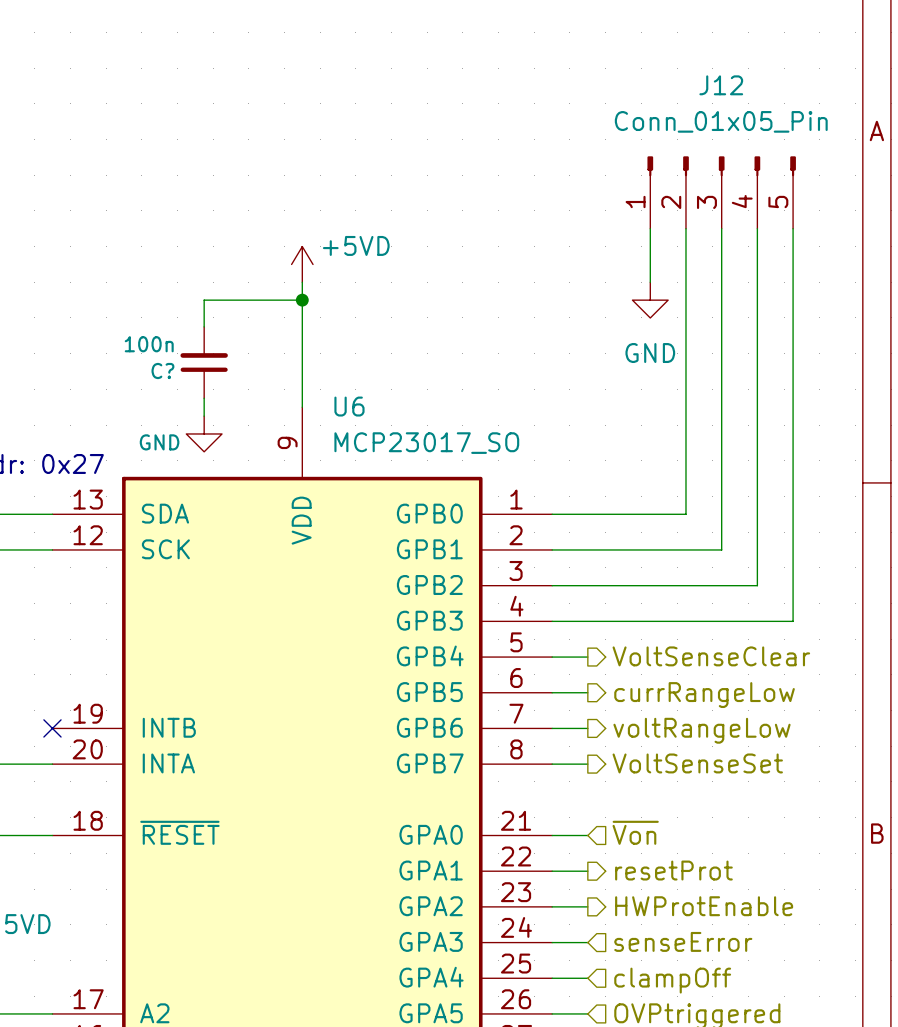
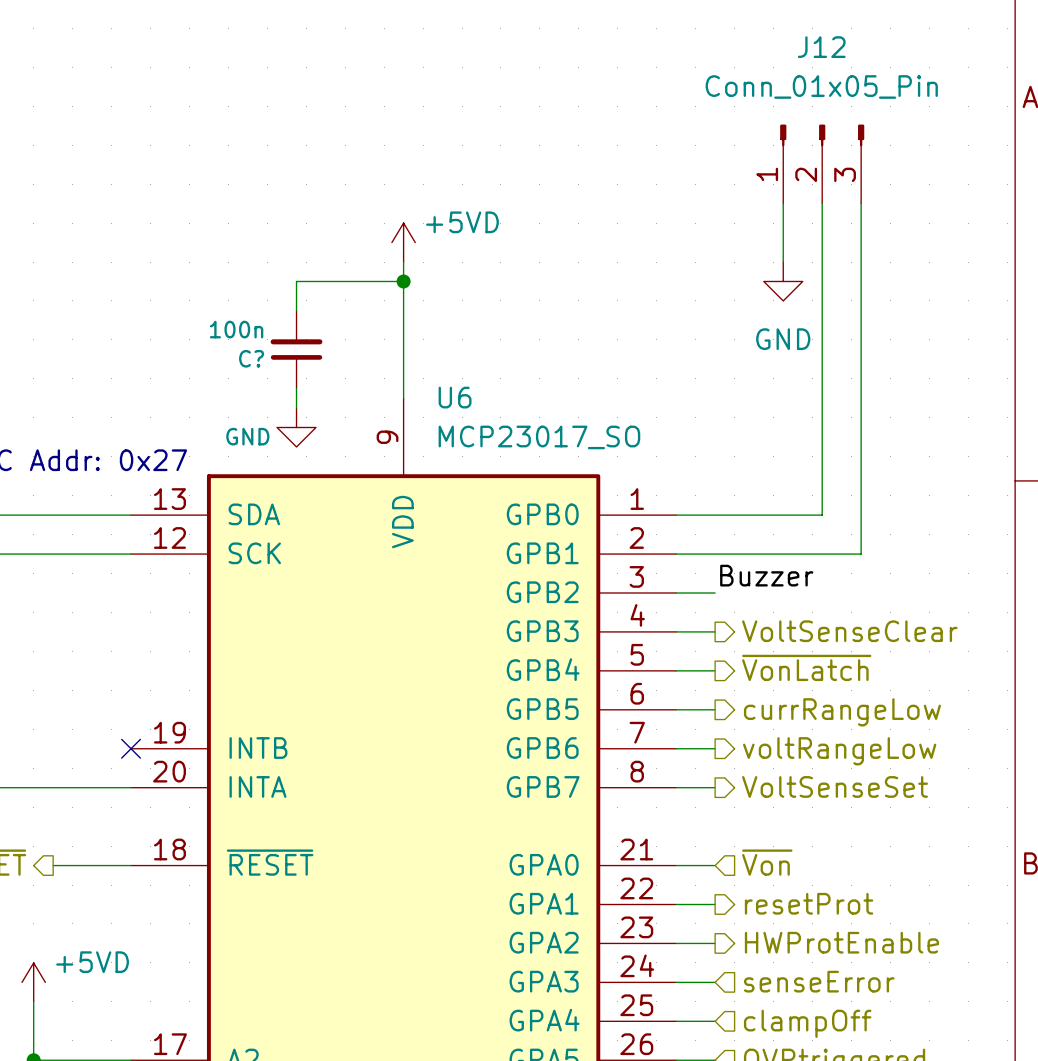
J12 symbol: [647, 156, 796, 229] -> [780, 124, 865, 204]
wire: (757, 228) (757, 585) (587, 585) -> none
wire: (793, 228) (793, 621) (587, 621) -> none
label: none -> Buzzer (766, 575)
hierarchical label: none -> VoltSenseClear (849, 631)
hierarchical label: VoltSenseClear (711, 656) -> ~{VonLatch} (806, 667)

